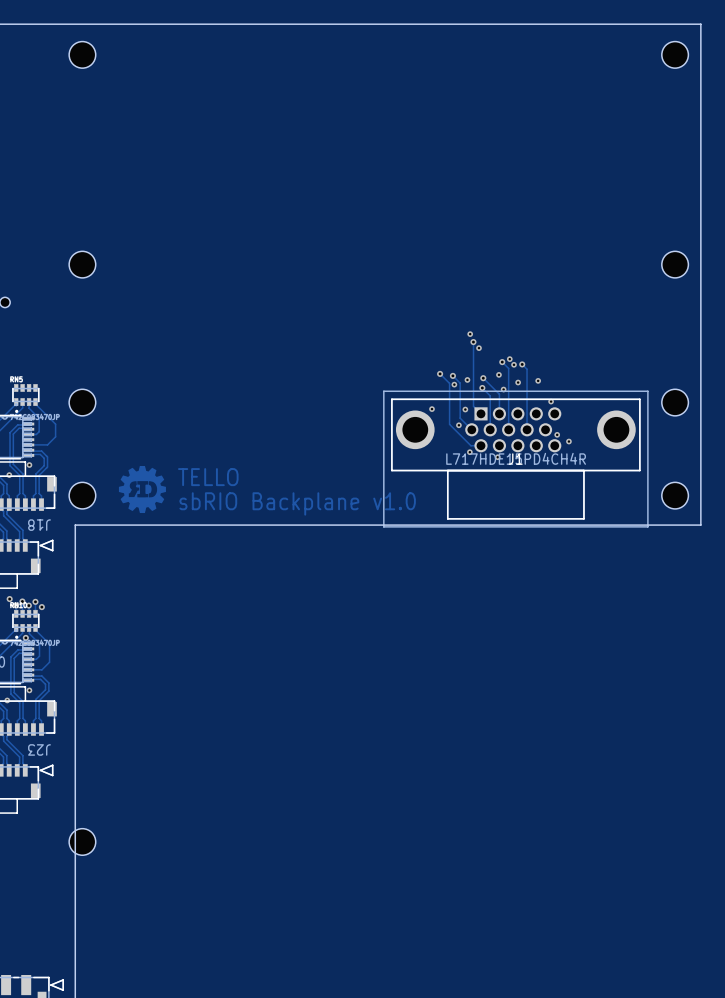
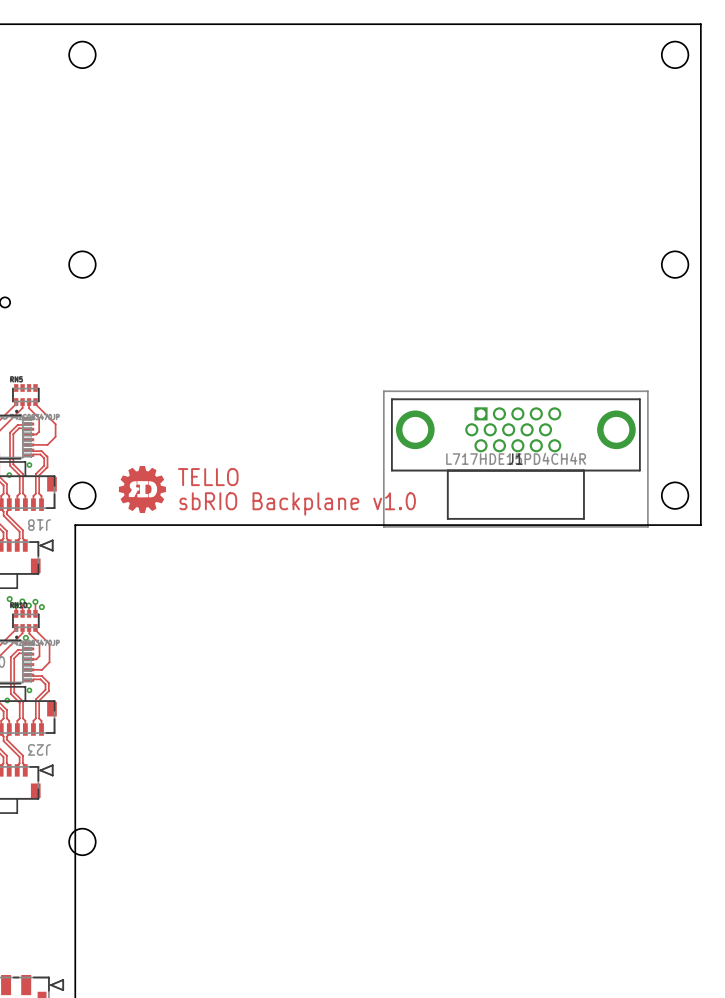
via: (470, 334) -> none
track: (473, 342) (473, 406) (481, 413) -> none
via: (473, 342) -> none
via: (479, 348) -> none
via: (509, 359) -> none
track: (502, 362) (508, 368) (508, 429) -> none
via: (502, 362) -> none
via: (514, 364) -> none
track: (522, 364) (527, 369) (527, 429) -> none
via: (522, 364) -> none
track: (440, 373) (449, 383) (449, 424) (470, 445) (481, 445) -> none
via: (440, 373) -> none
via: (498, 374) -> none
track: (452, 375) (460, 383) (460, 418) (471, 429) -> none
via: (452, 375) -> none
track: (483, 378) (499, 394) (499, 413) -> none
via: (483, 378) -> none
via: (467, 379) -> none
via: (538, 380) -> none
via: (518, 382) -> none
via: (454, 384) -> none
track: (482, 388) (490, 395) (490, 429) -> none
via: (482, 388) -> none
via: (503, 389) -> none
via: (551, 401) -> none
hole: (82, 402) -> none
hole: (675, 402) -> none
via: (431, 409) -> none
via: (465, 409) -> none
via: (458, 425) -> none
via: (557, 434) -> none
via: (568, 441) -> none
via: (469, 452) -> none
via: (497, 457) -> none

